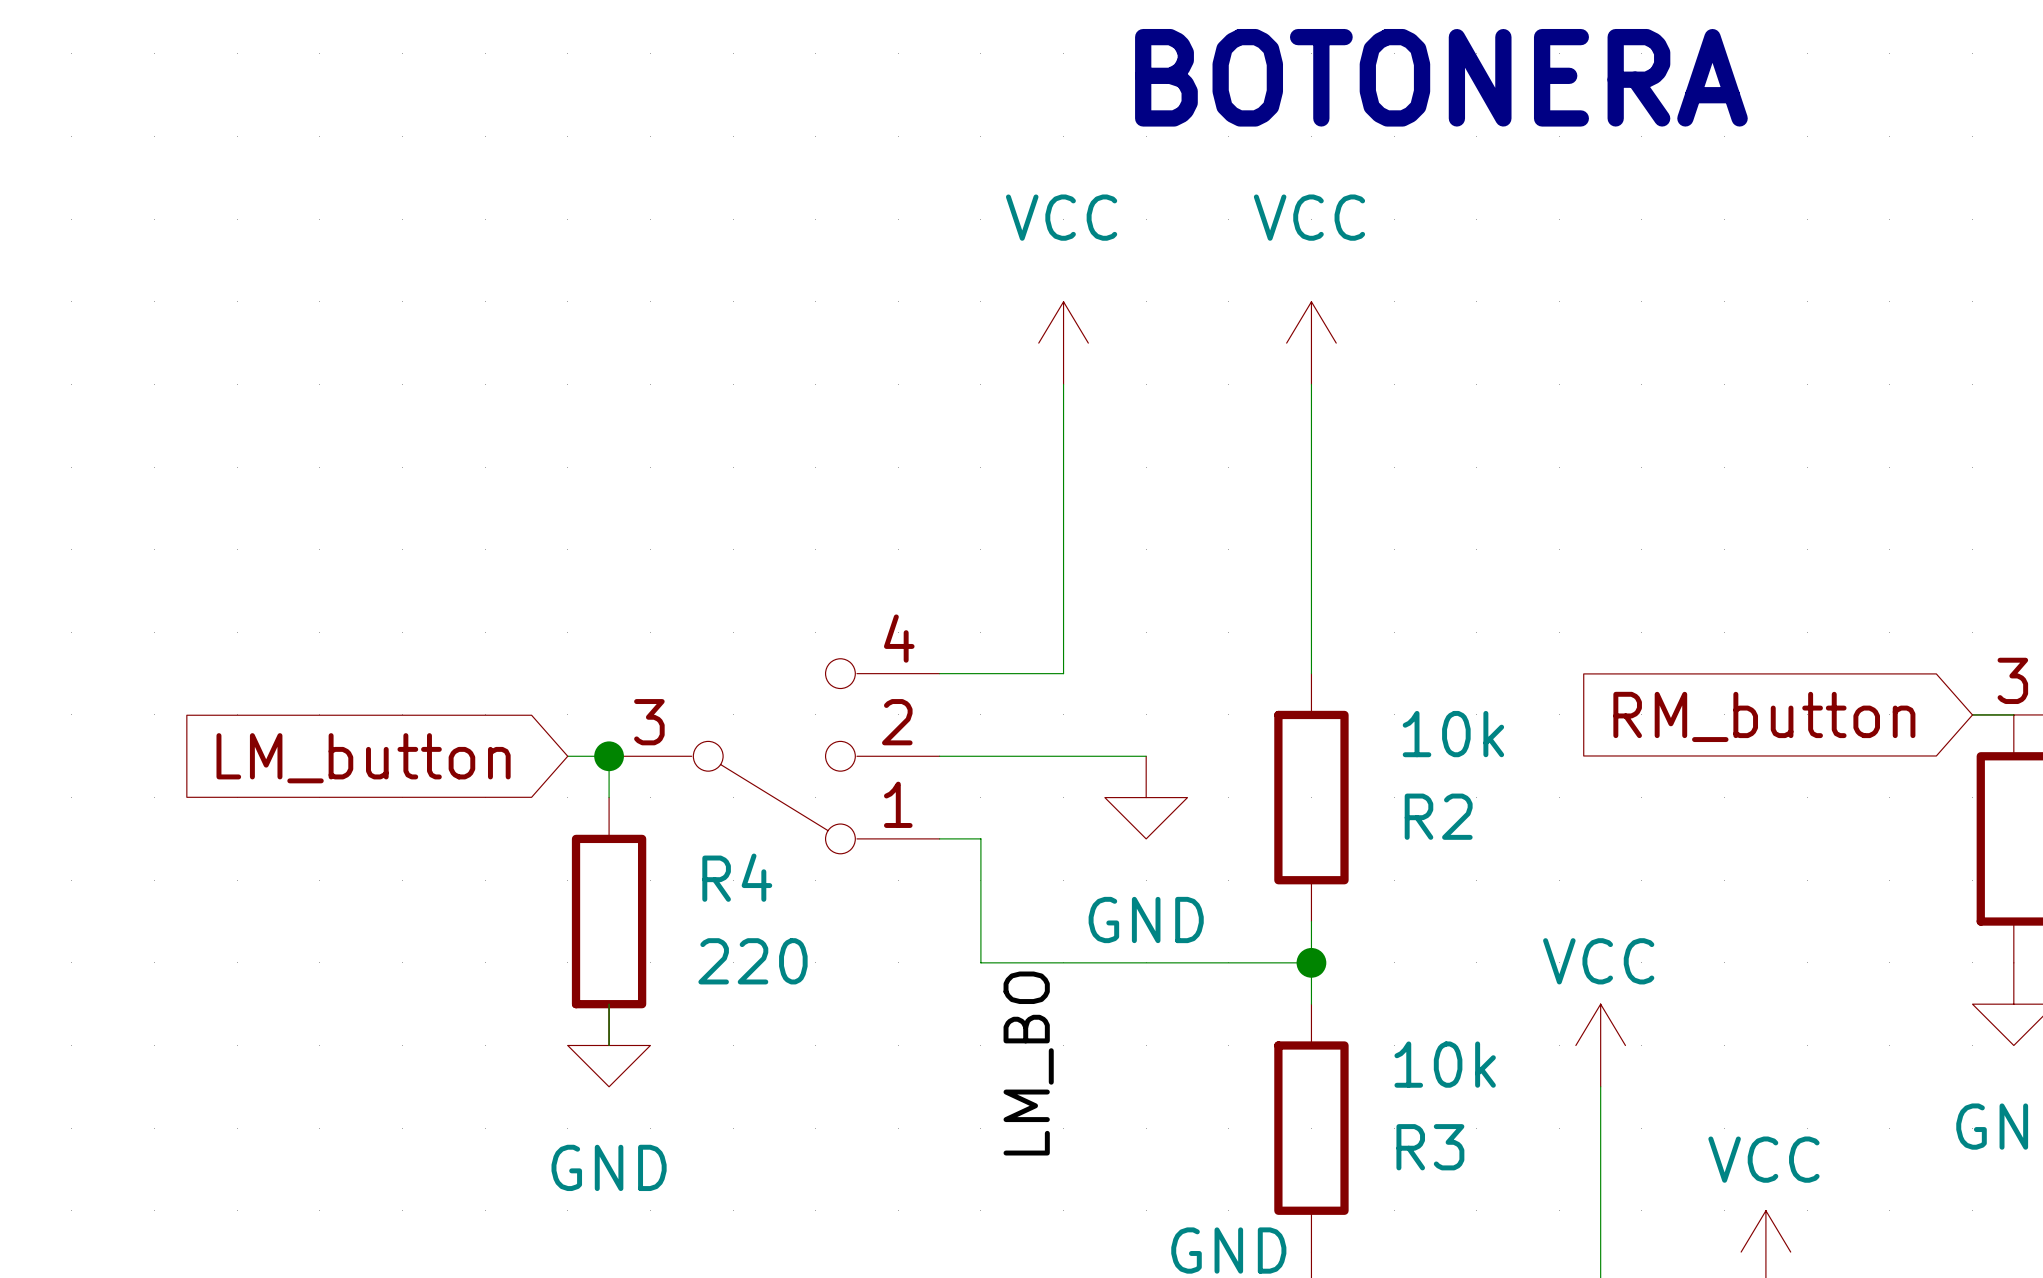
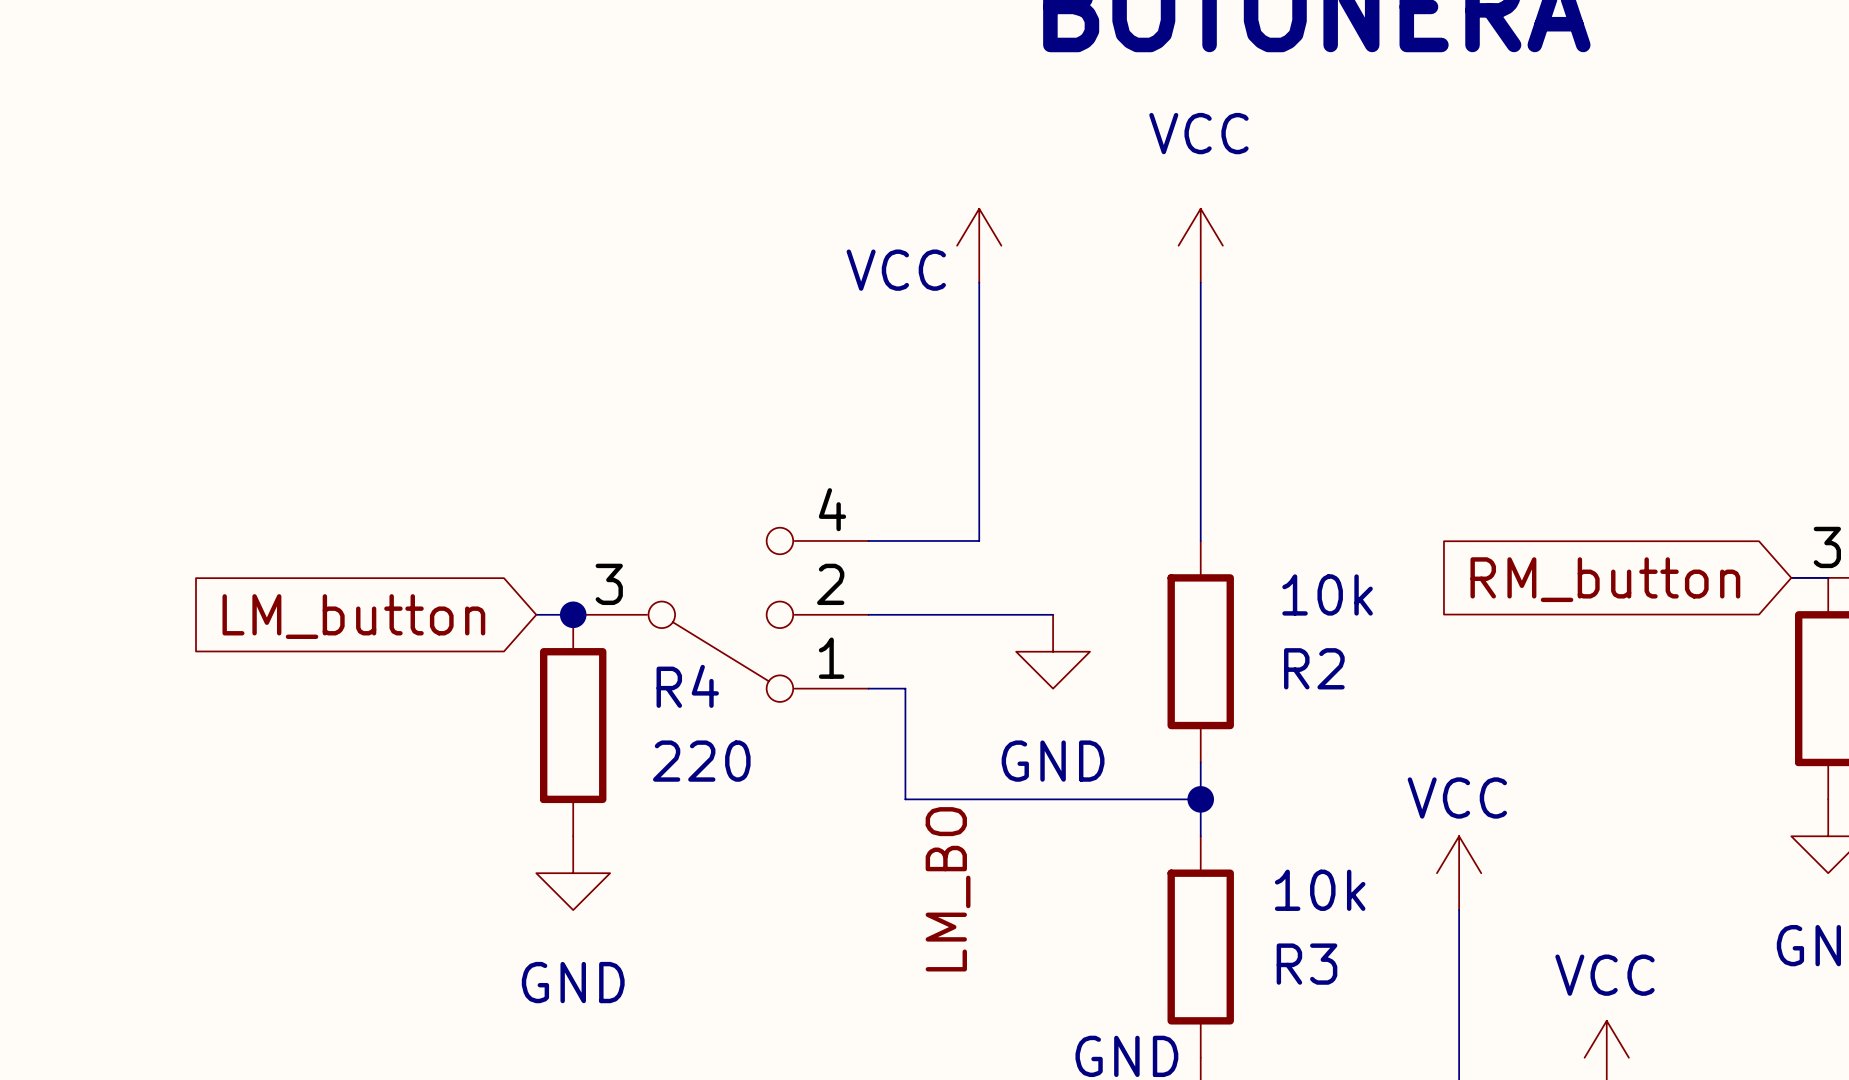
power symbol text position: VCC (1061, 217) -> VCC (896, 270)
R4 position: (609, 921) -> (573, 725)

